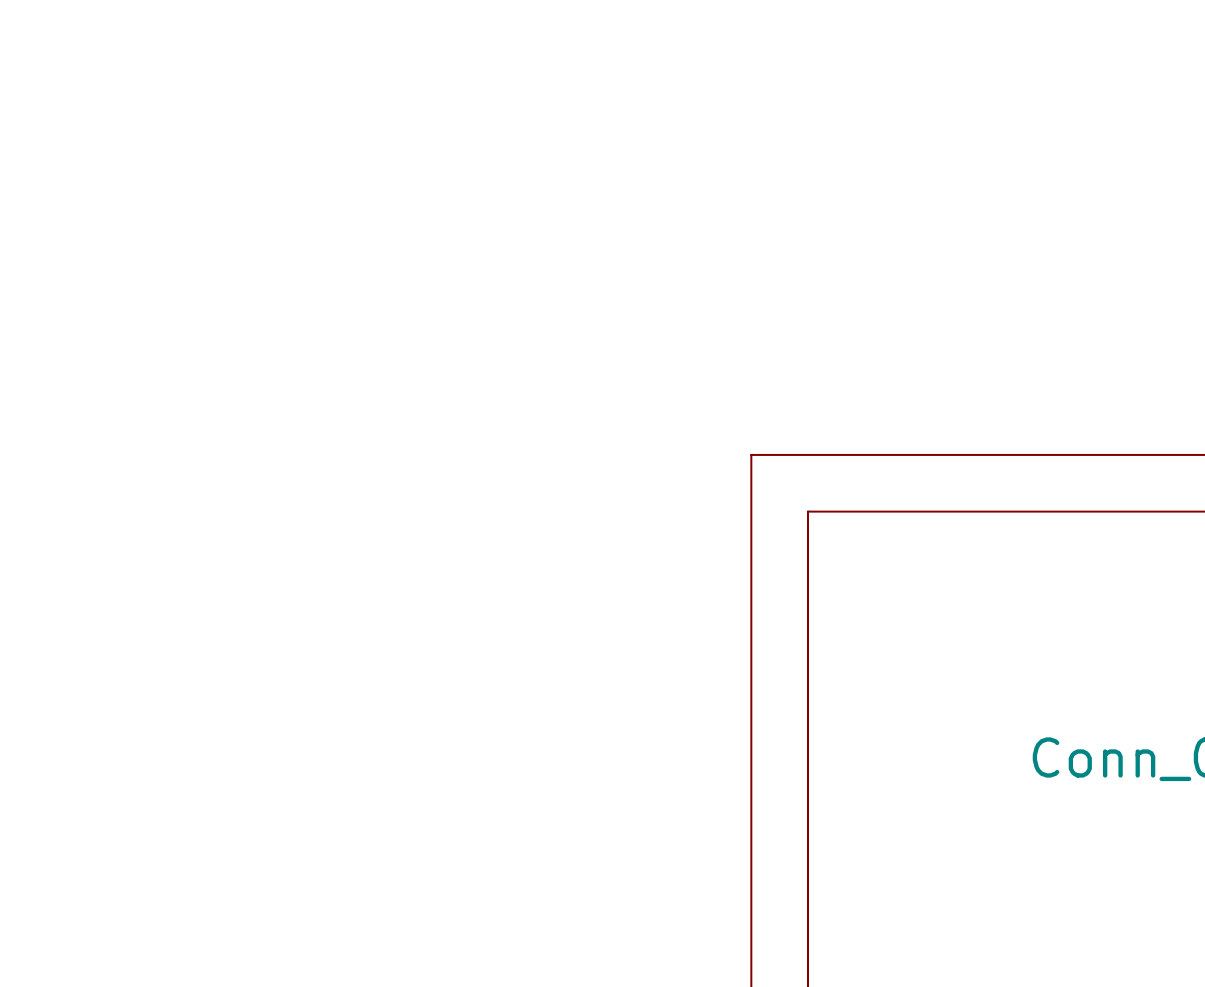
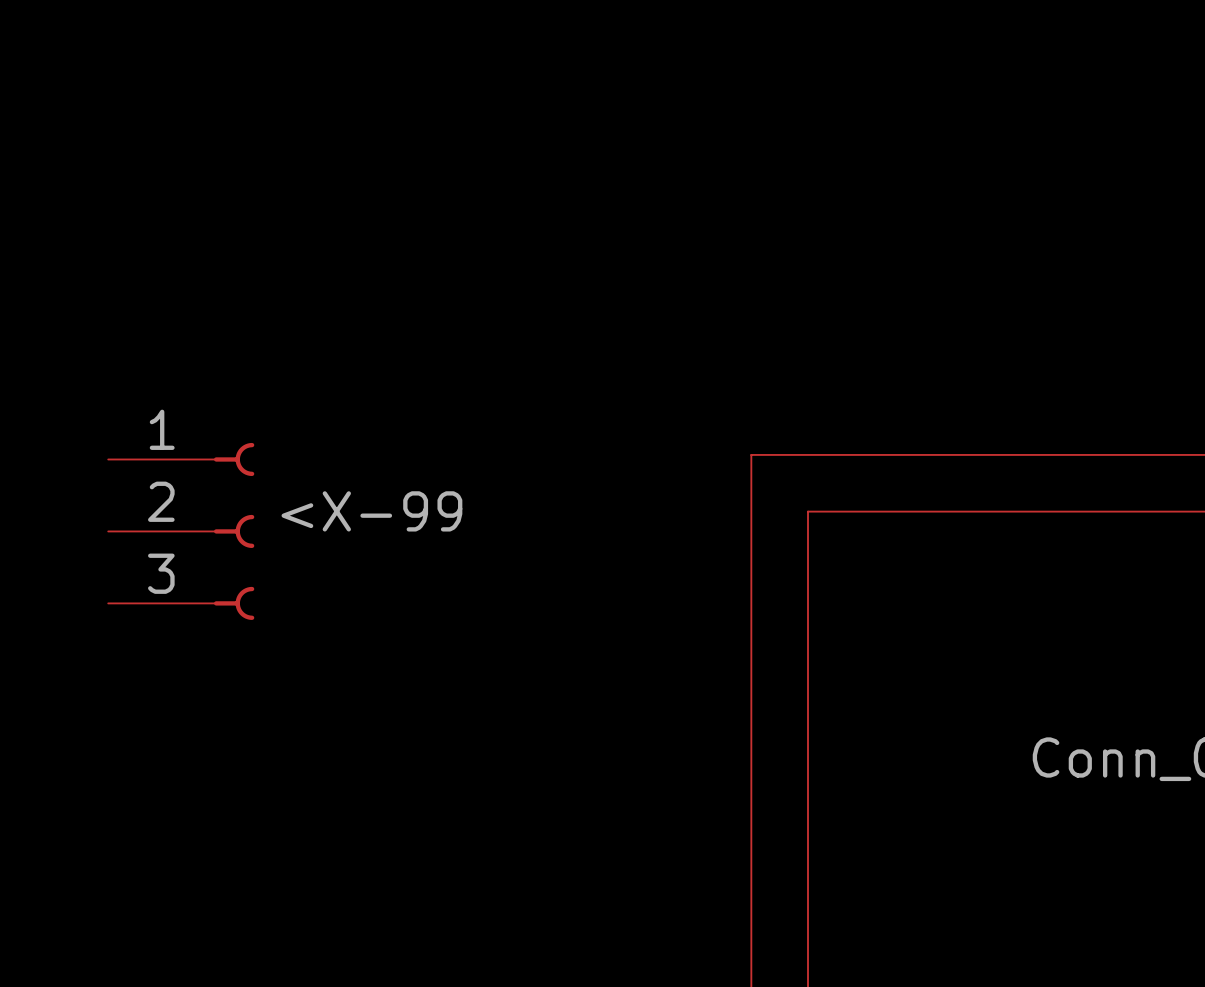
<X-99: none -> (181, 531)

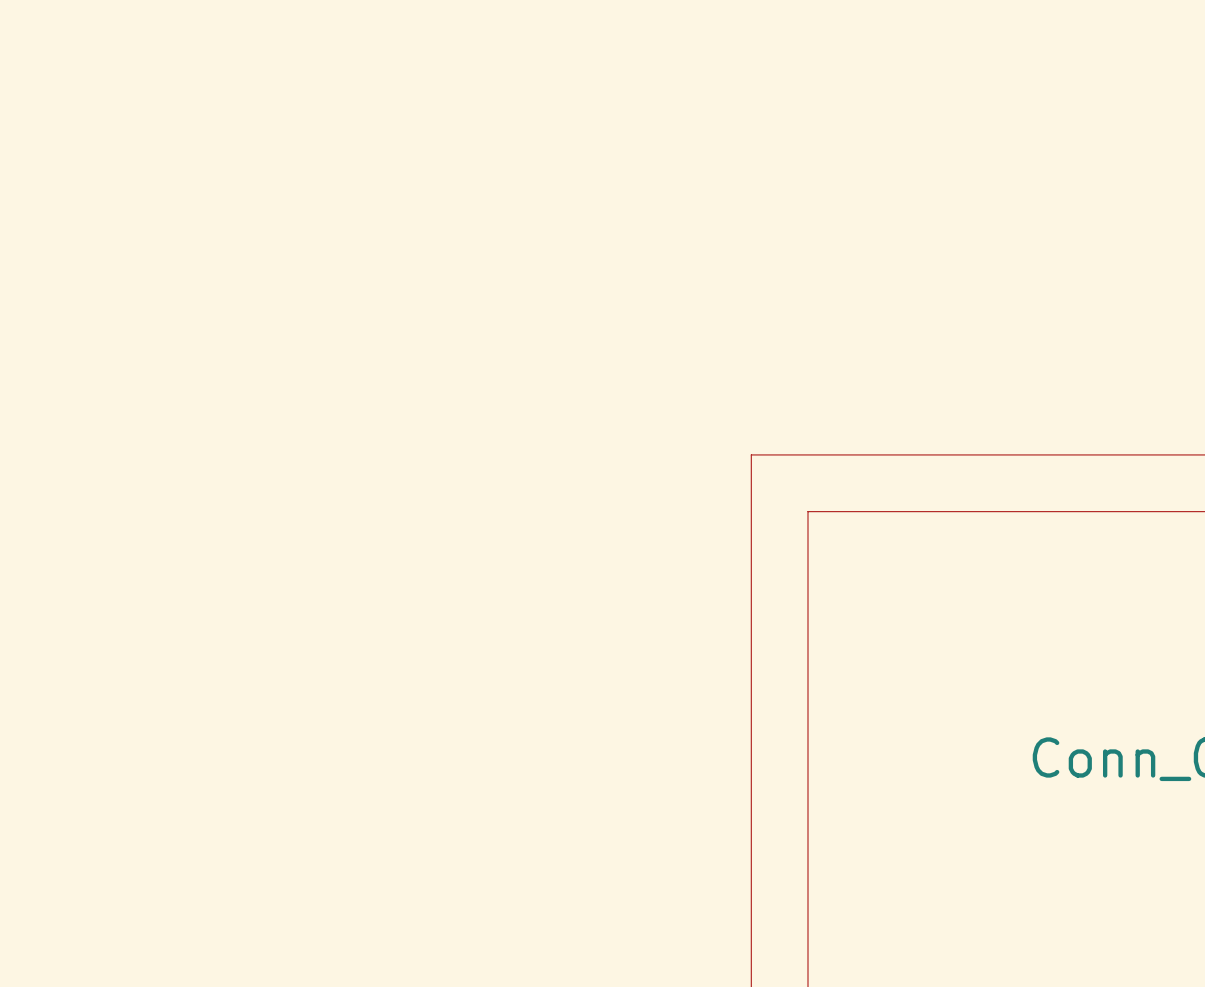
<X-99: (181, 531) -> none

